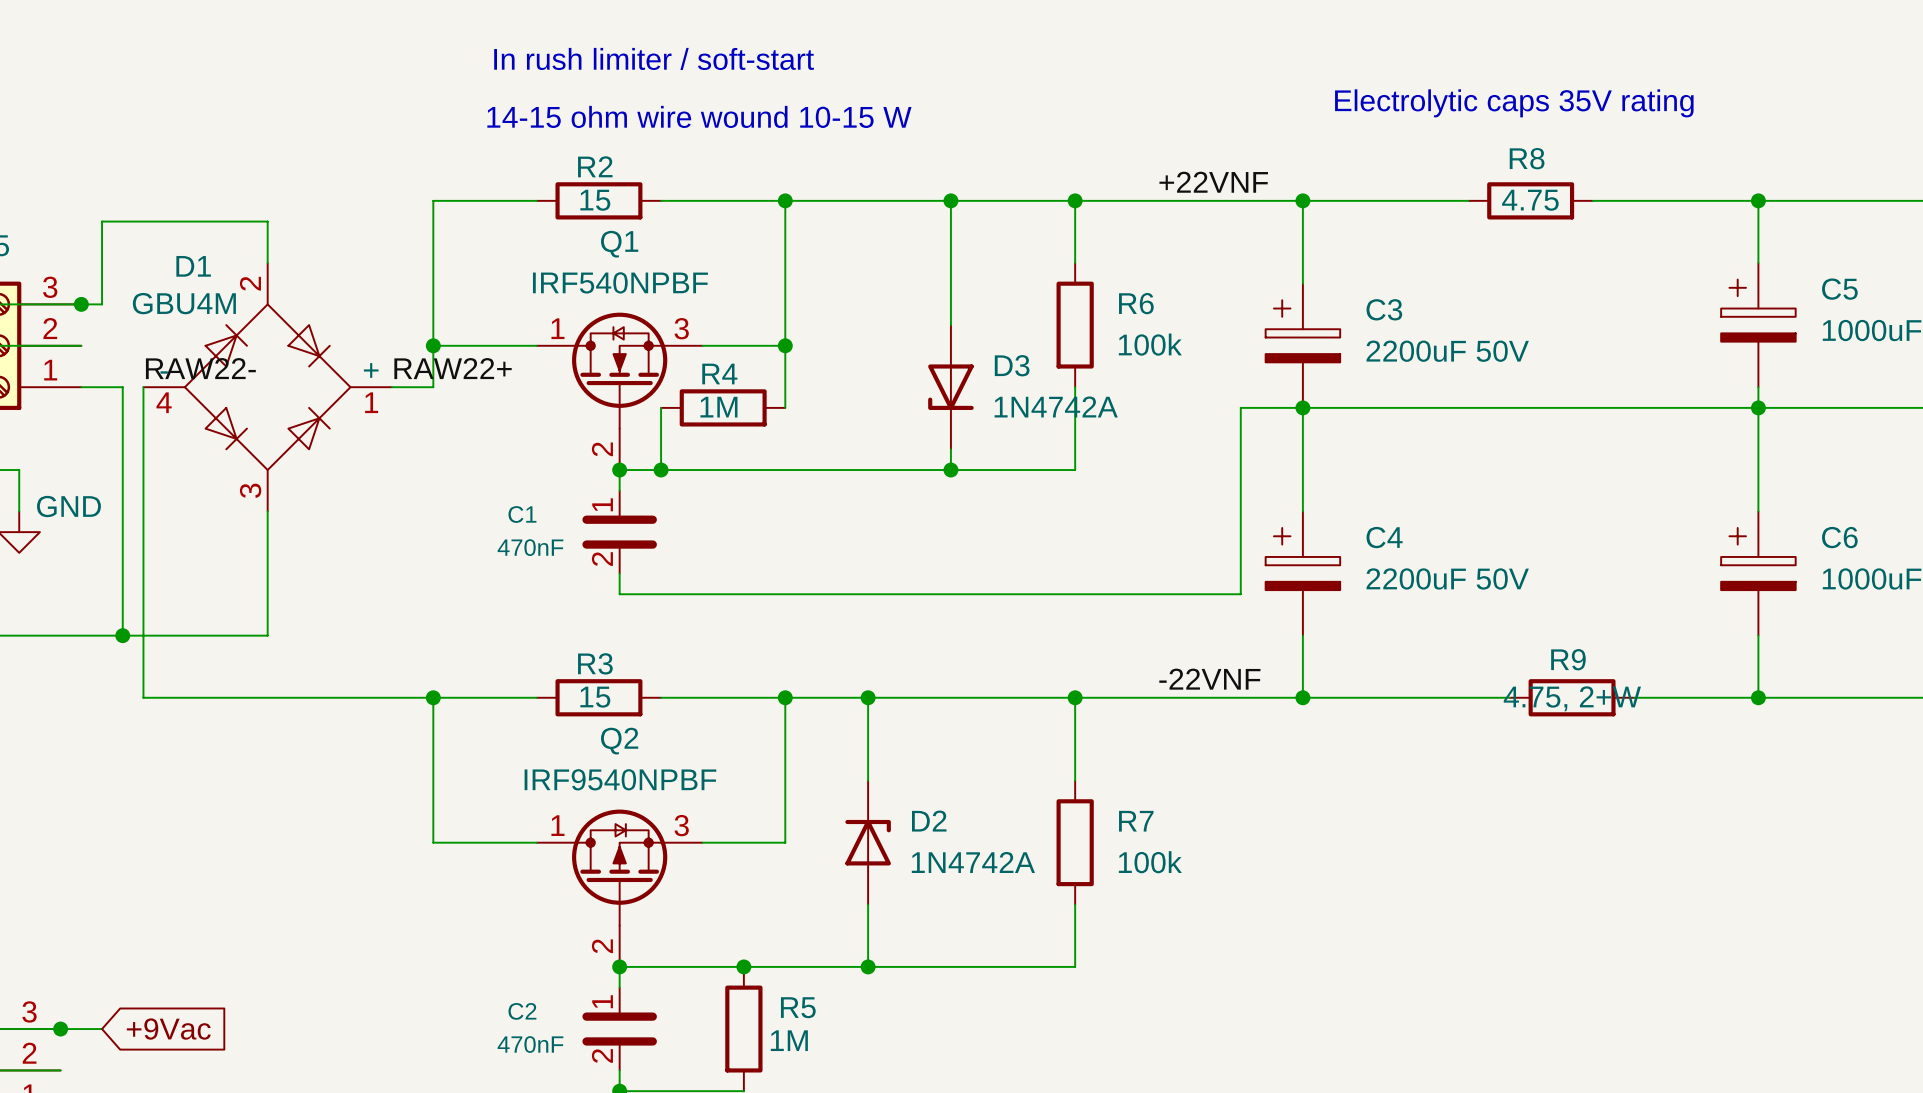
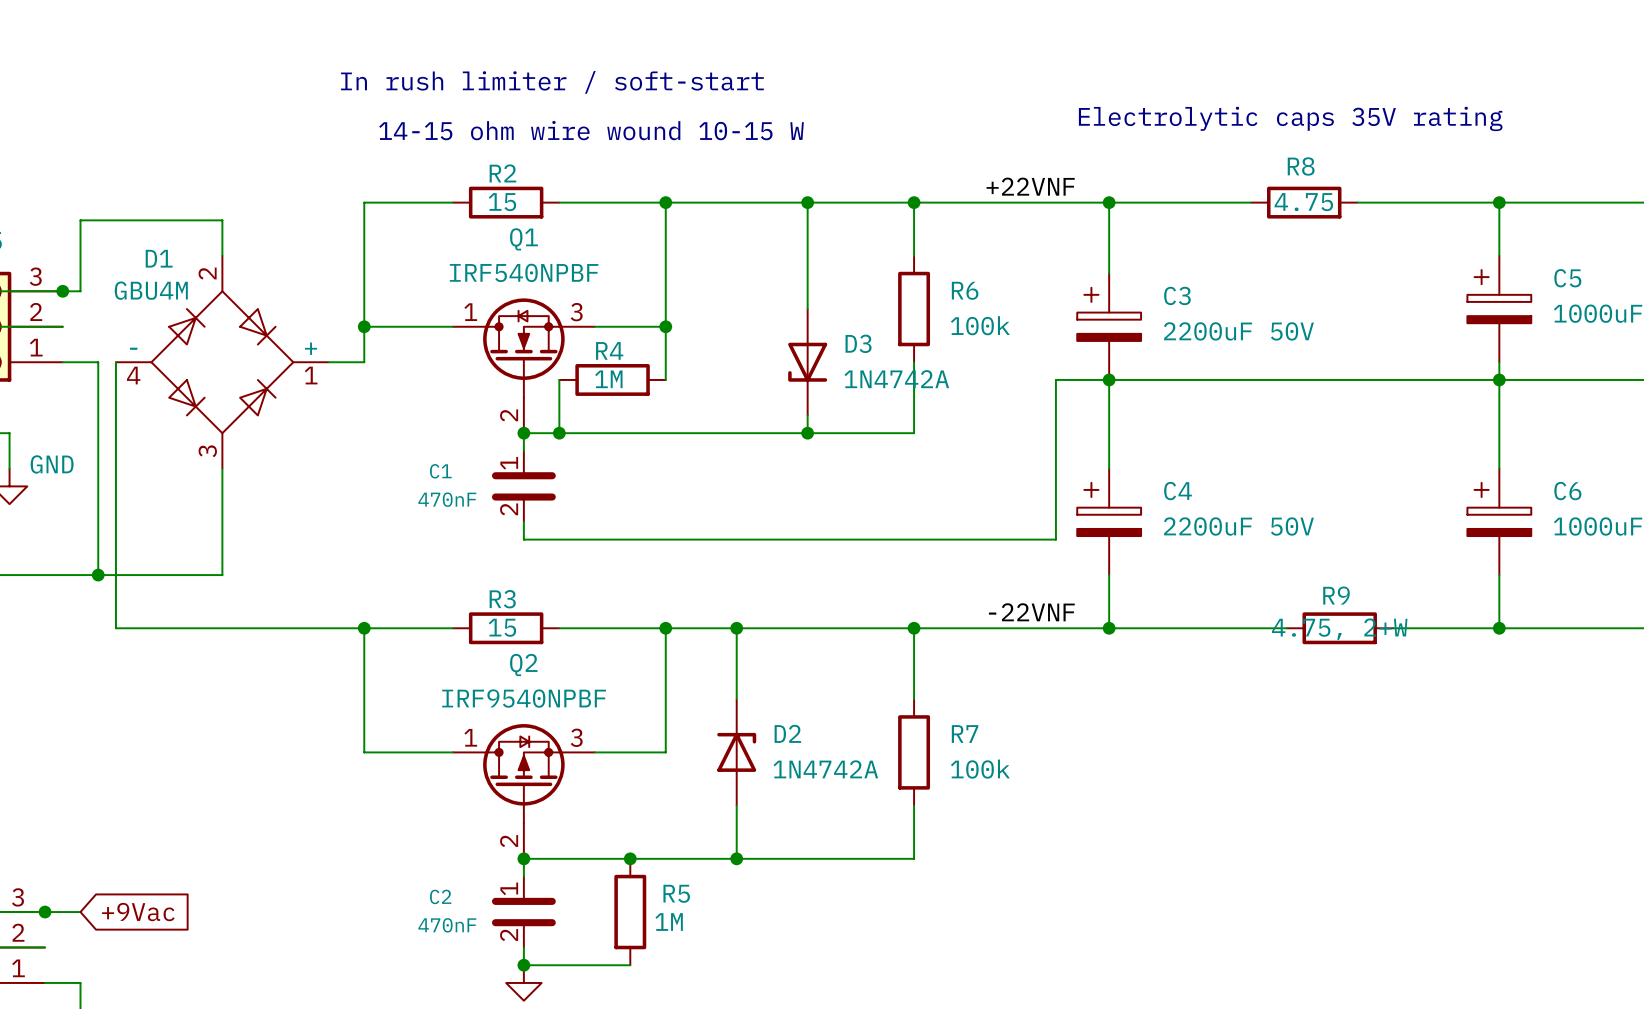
label: RAW22- (200, 368) -> none
label: RAW22+ (453, 368) -> none

